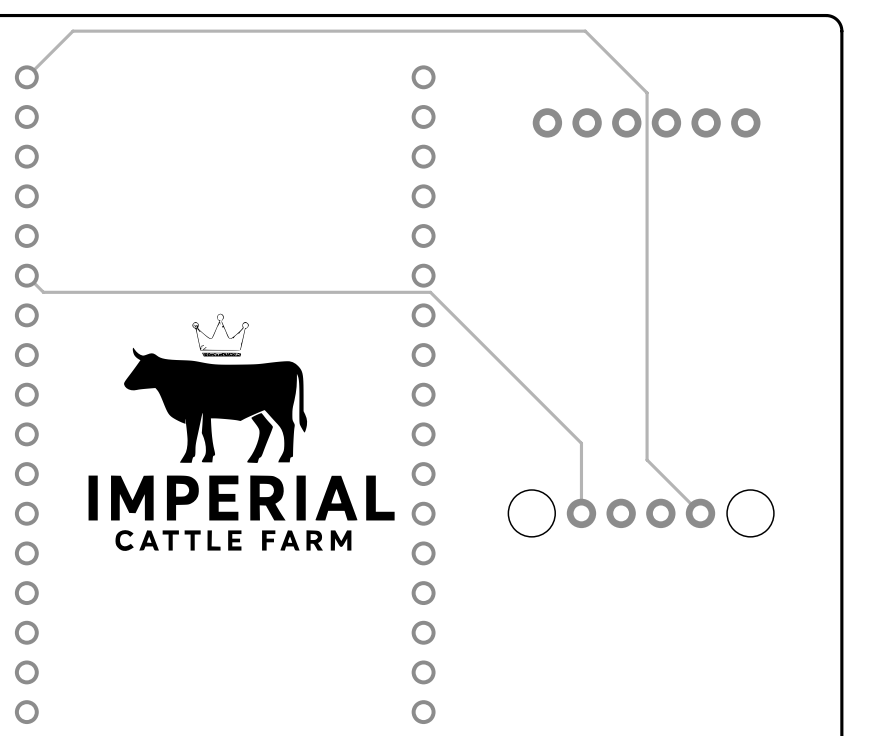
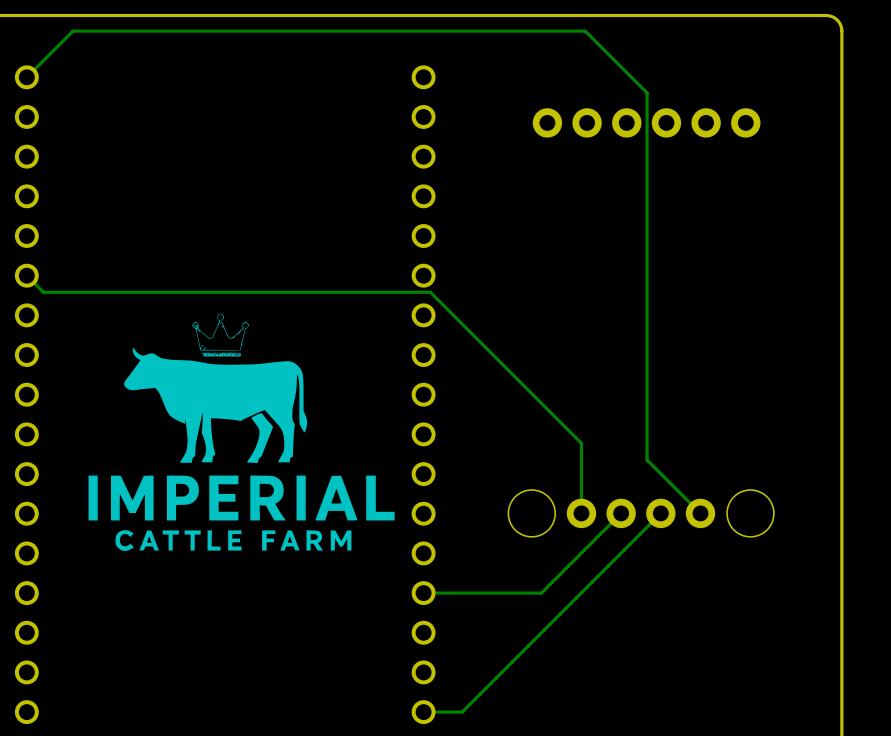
track: none -> (621, 513) (541, 593) (423, 593)
track: none -> (660, 513) (462, 712) (423, 712)

